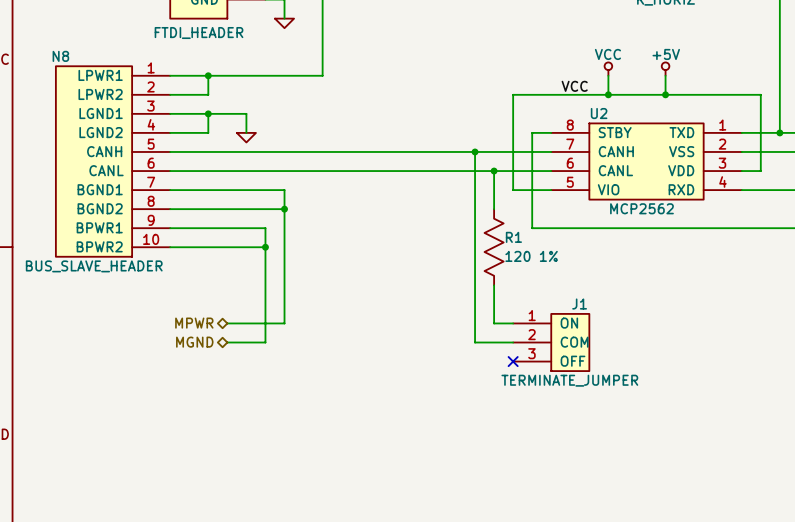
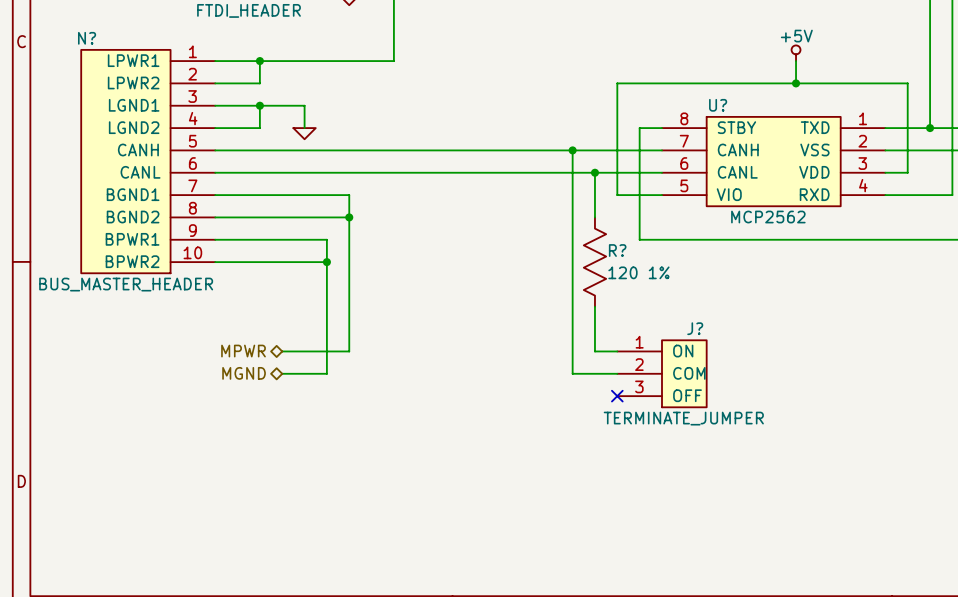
N8 name: N8 (60, 56) -> N? (87, 38)
power symbol: VCC (608, 69) -> none
wire: (608, 75) (608, 94) -> none
label: VCC (574, 86) -> none
junction: (608, 94) -> none
U2 name: U2 (599, 113) -> U? (718, 105)
R1 name: R1 (513, 237) -> R? (617, 250)
N8 value: BUS_SLAVE_HEADER (94, 266) -> BUS_MASTER_HEADER (126, 284)
J1 name: J1 (579, 304) -> J? (695, 328)

